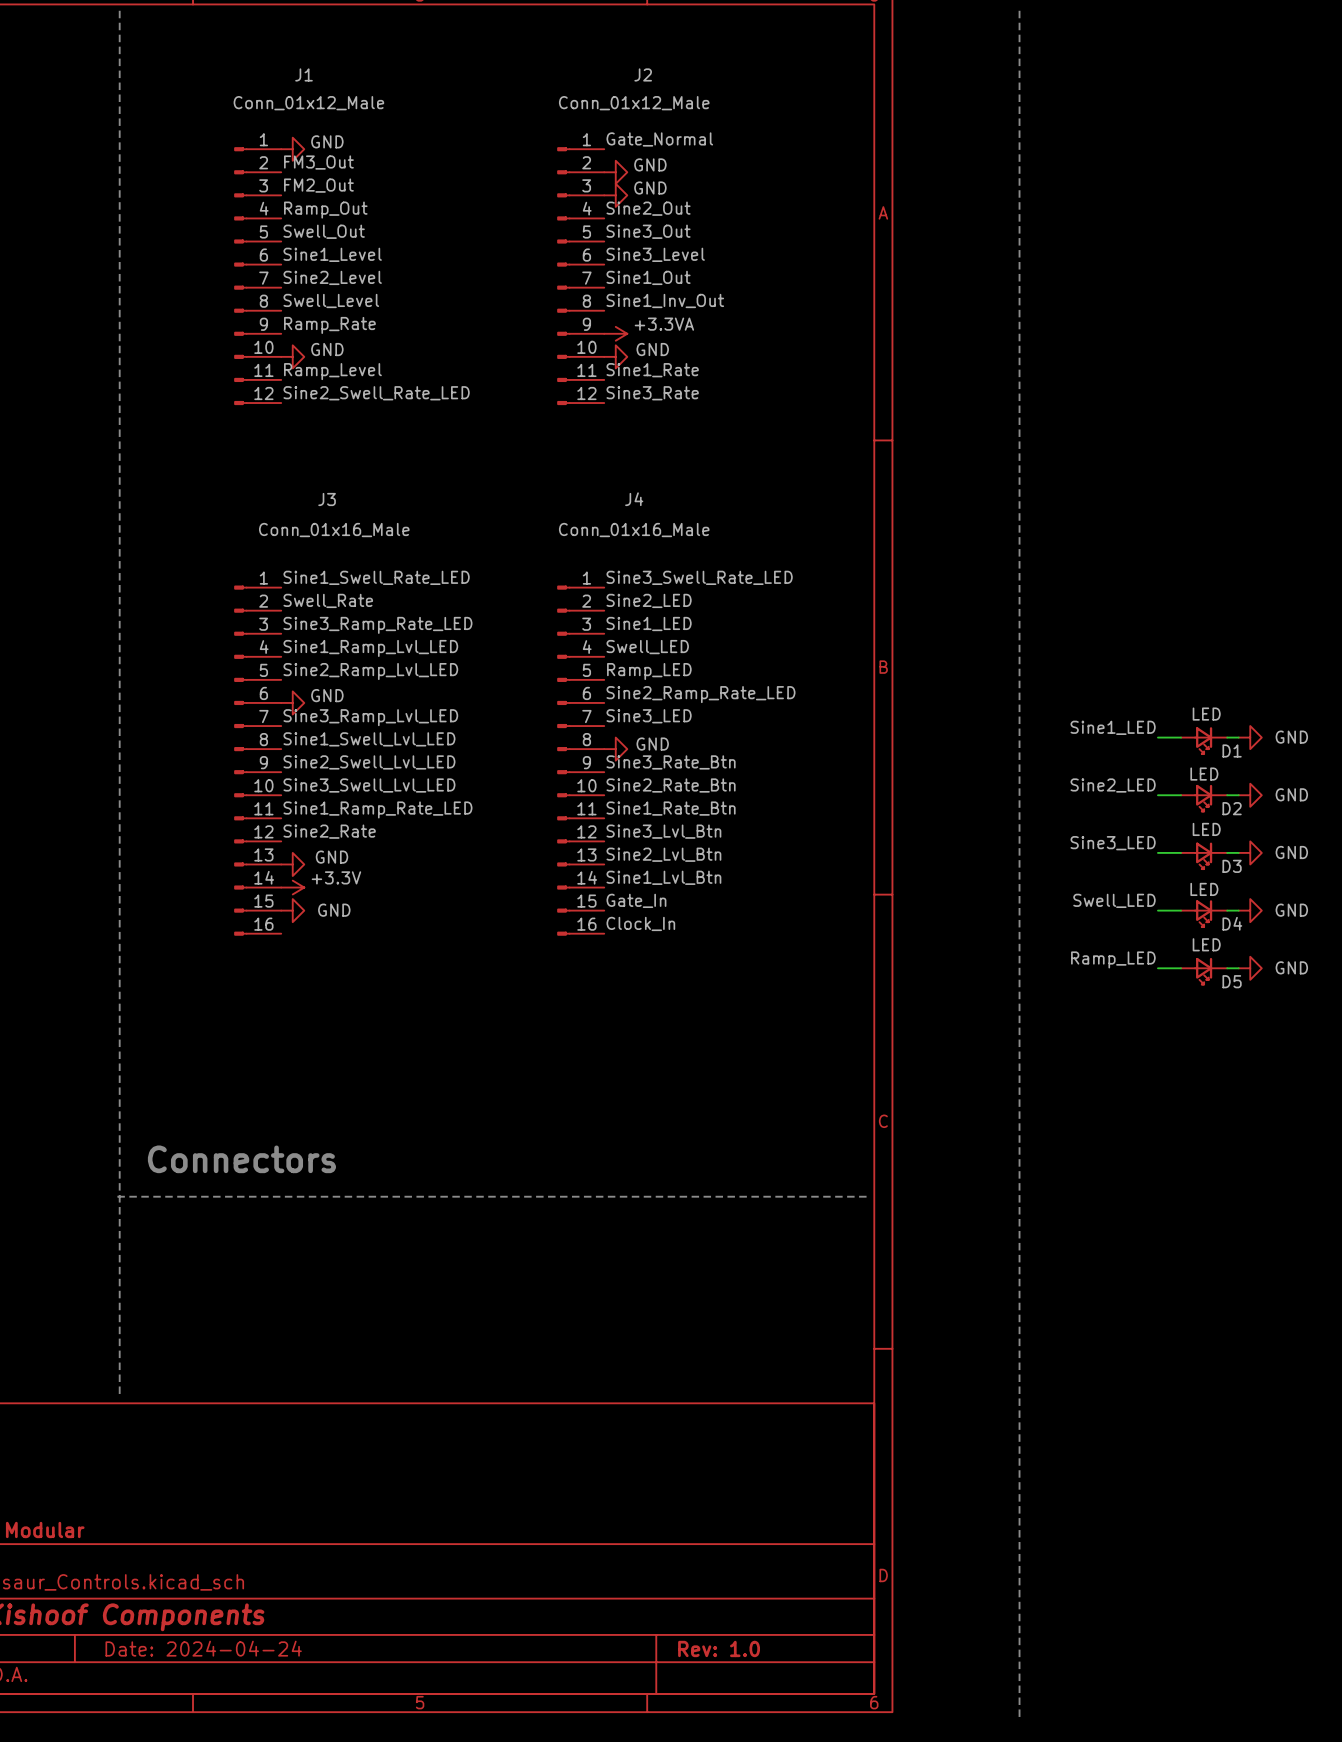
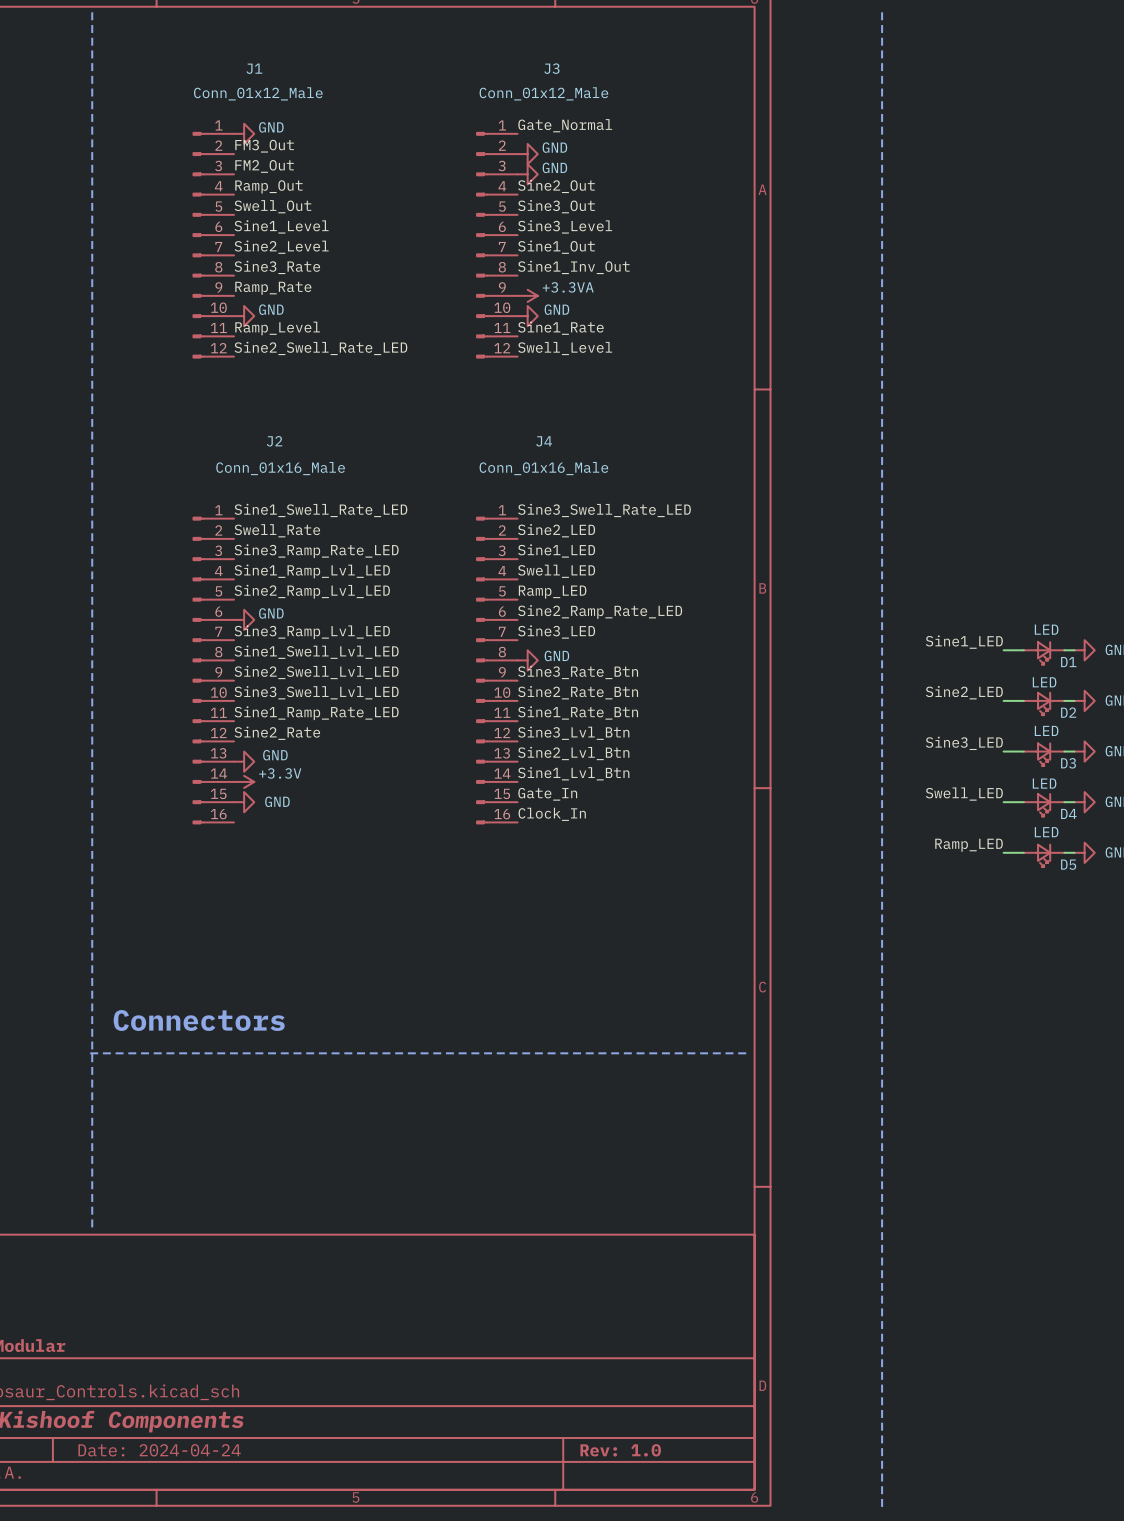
J2 name: J2 (643, 74) -> J3 (551, 68)
label: Swell_Level (331, 300) -> Sine3_Rate (277, 267)
label: Sine3_Rate (652, 393) -> Swell_Level (565, 348)
J3 name: J3 (327, 499) -> J2 (274, 441)

